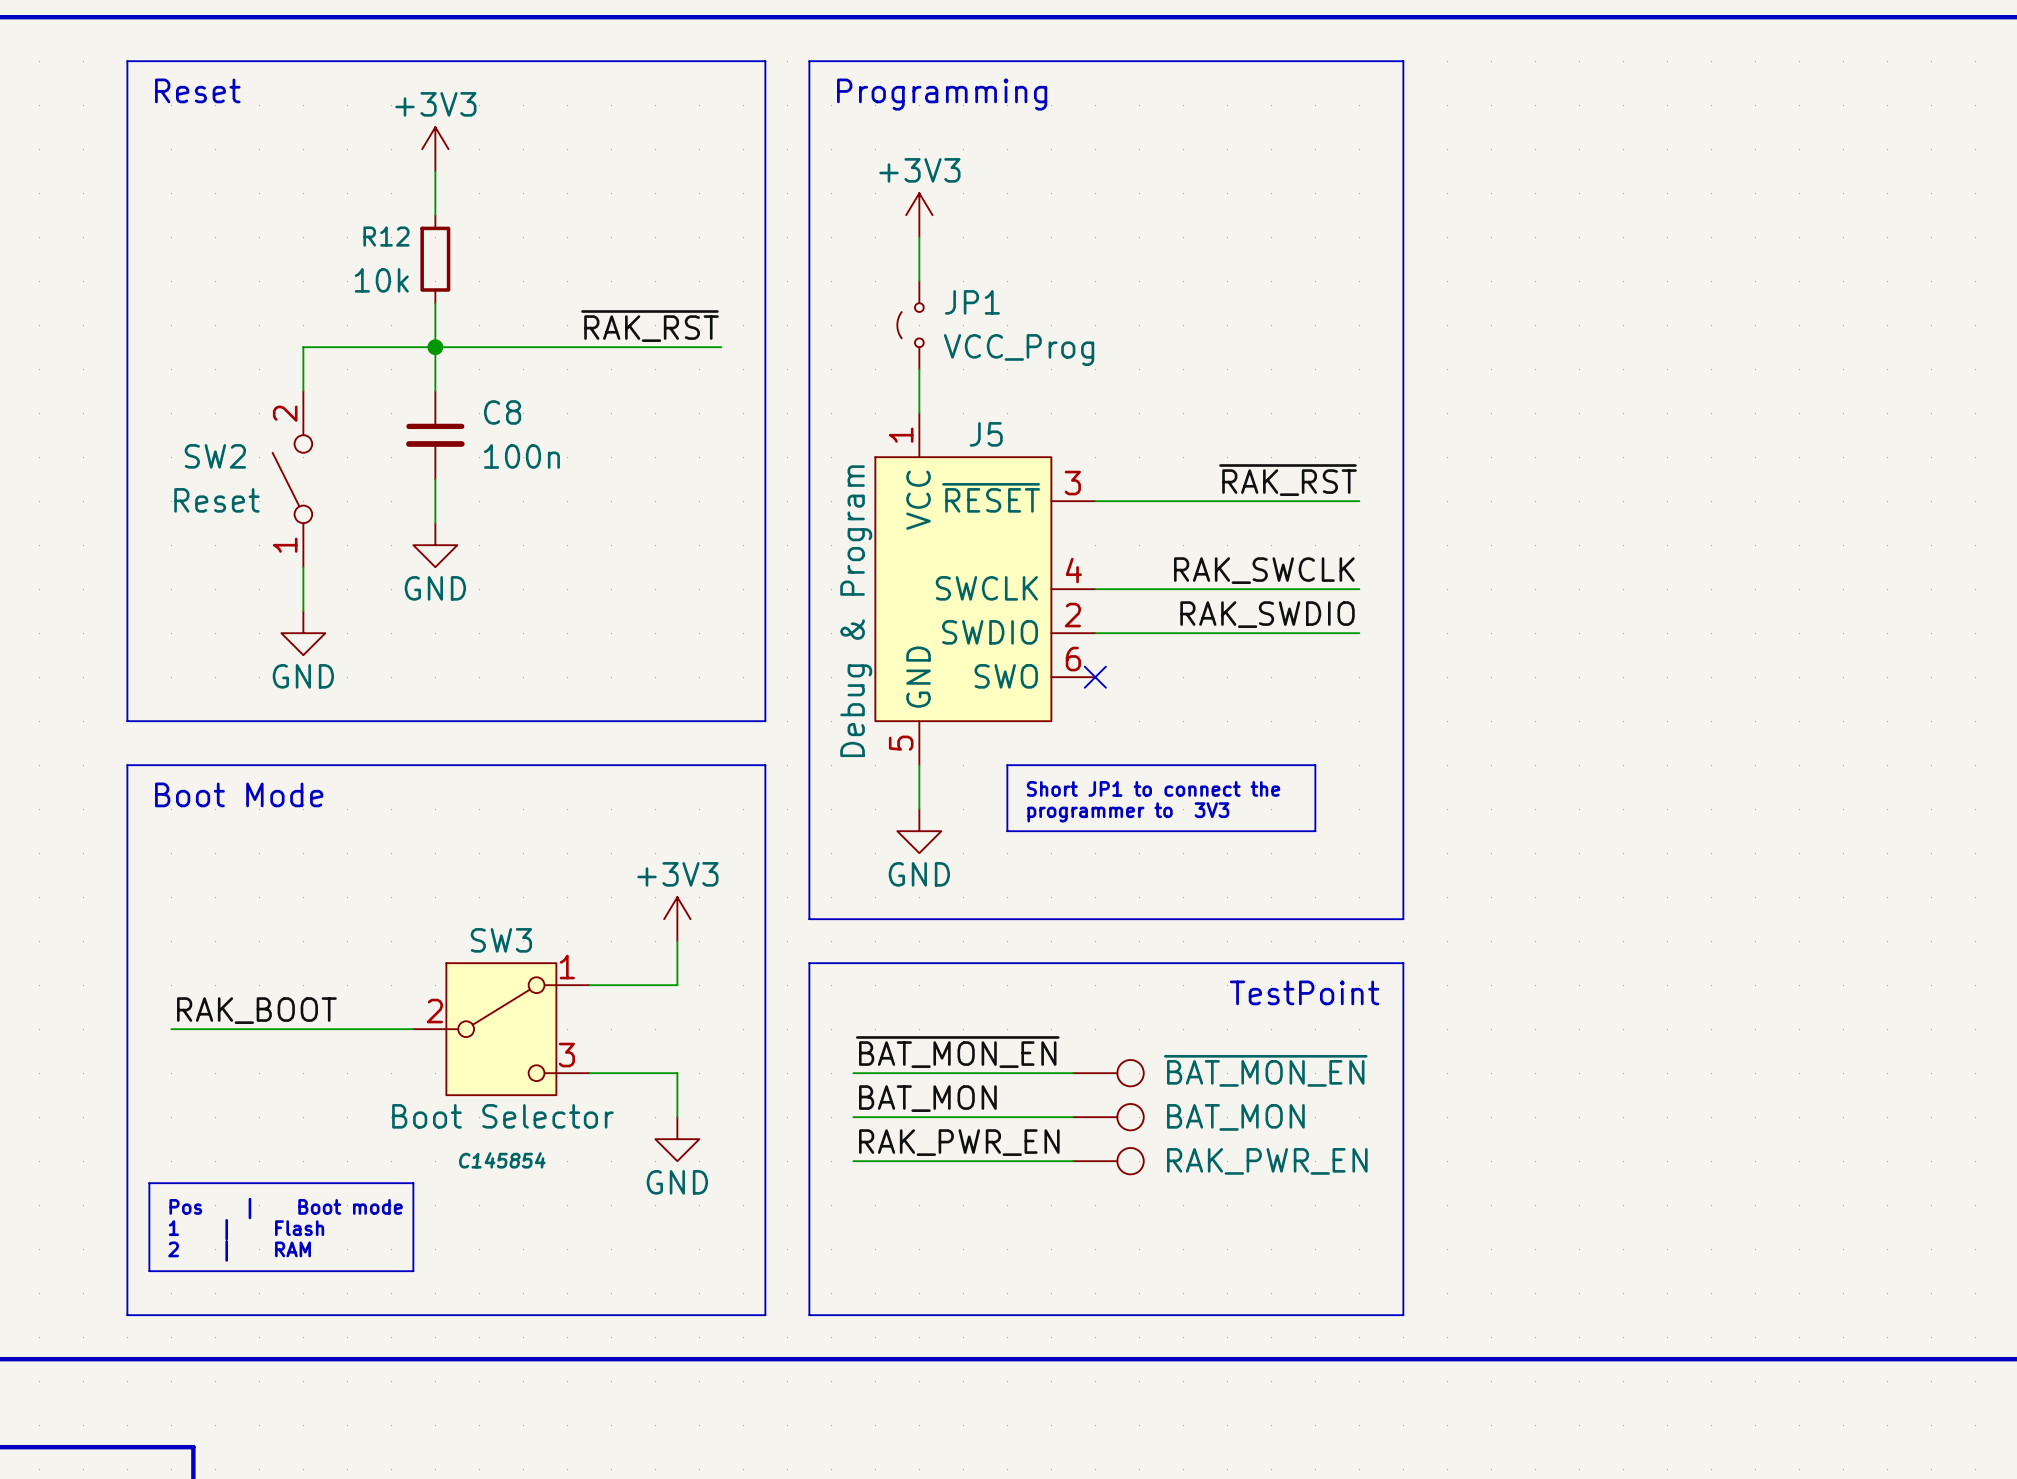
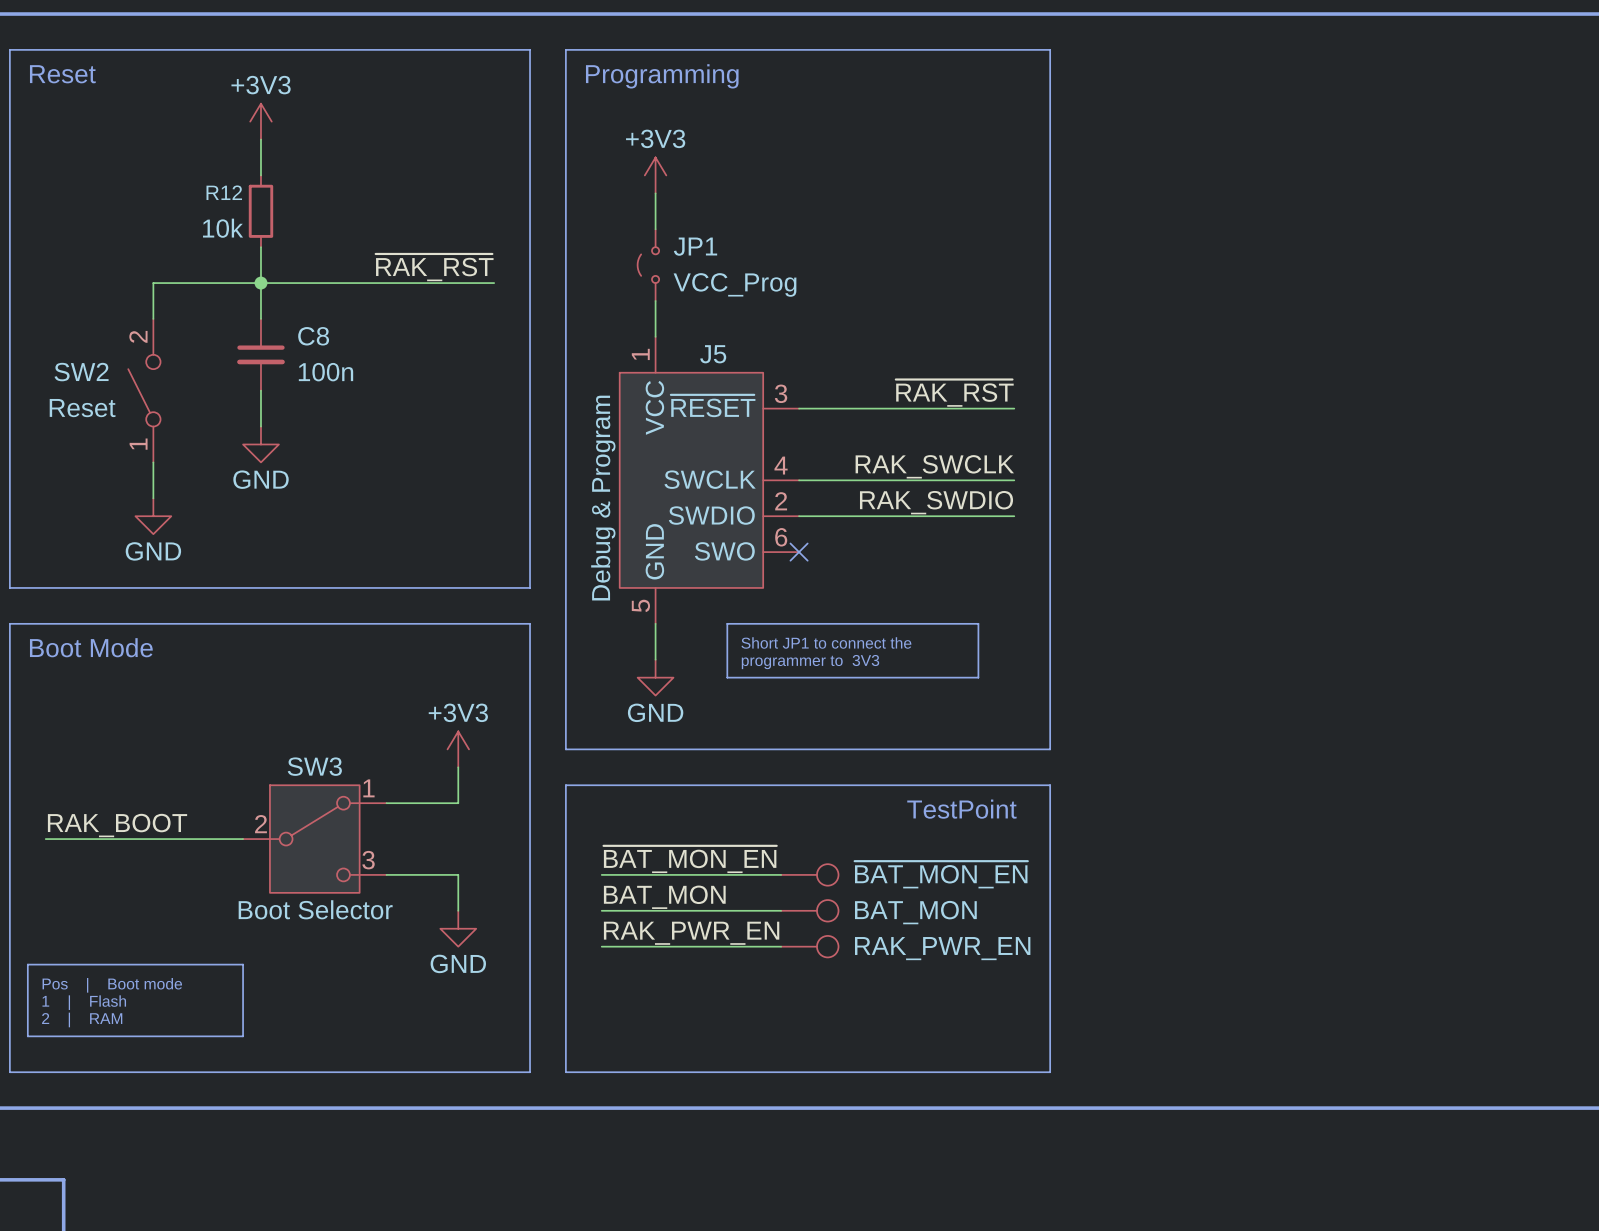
SW3 text: C145854 (502, 1160) -> none

